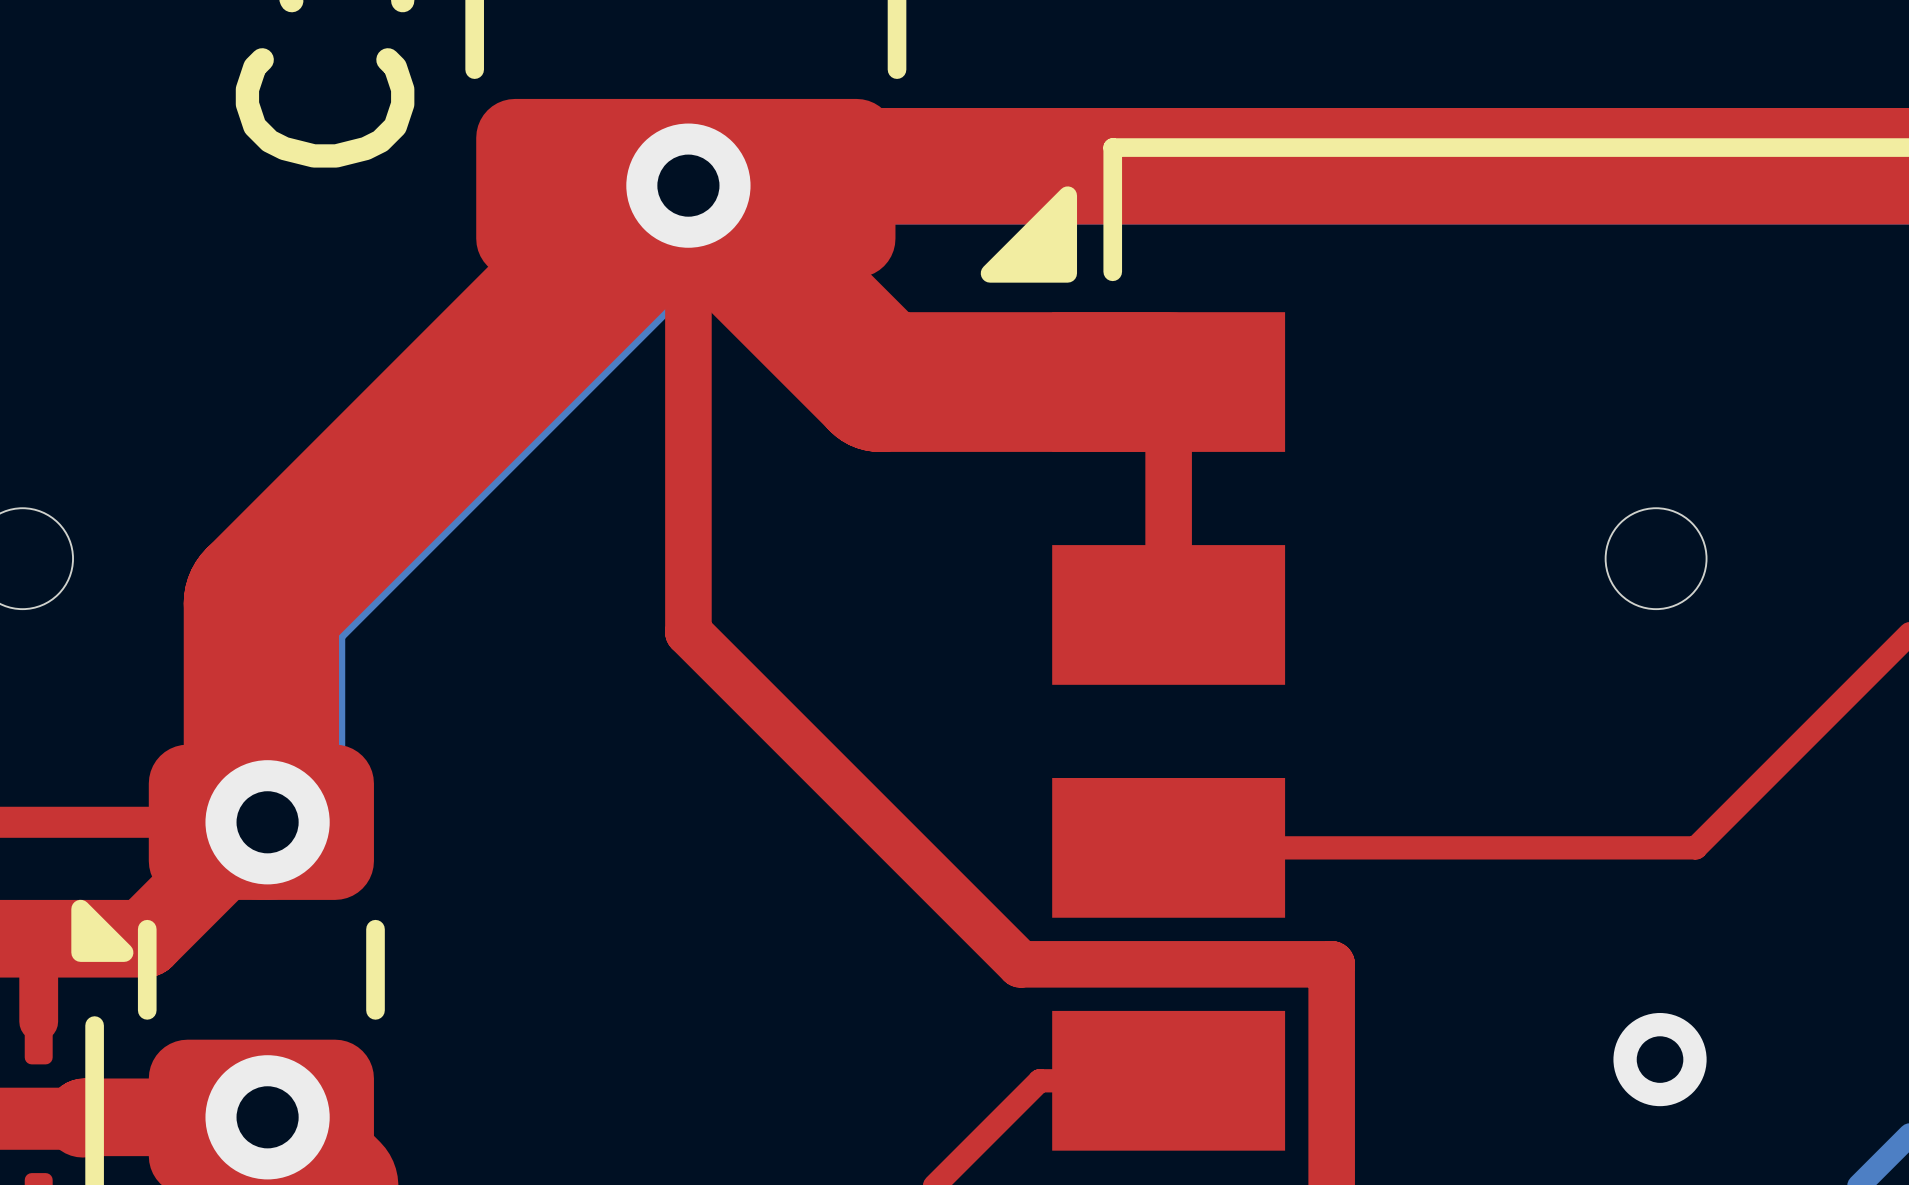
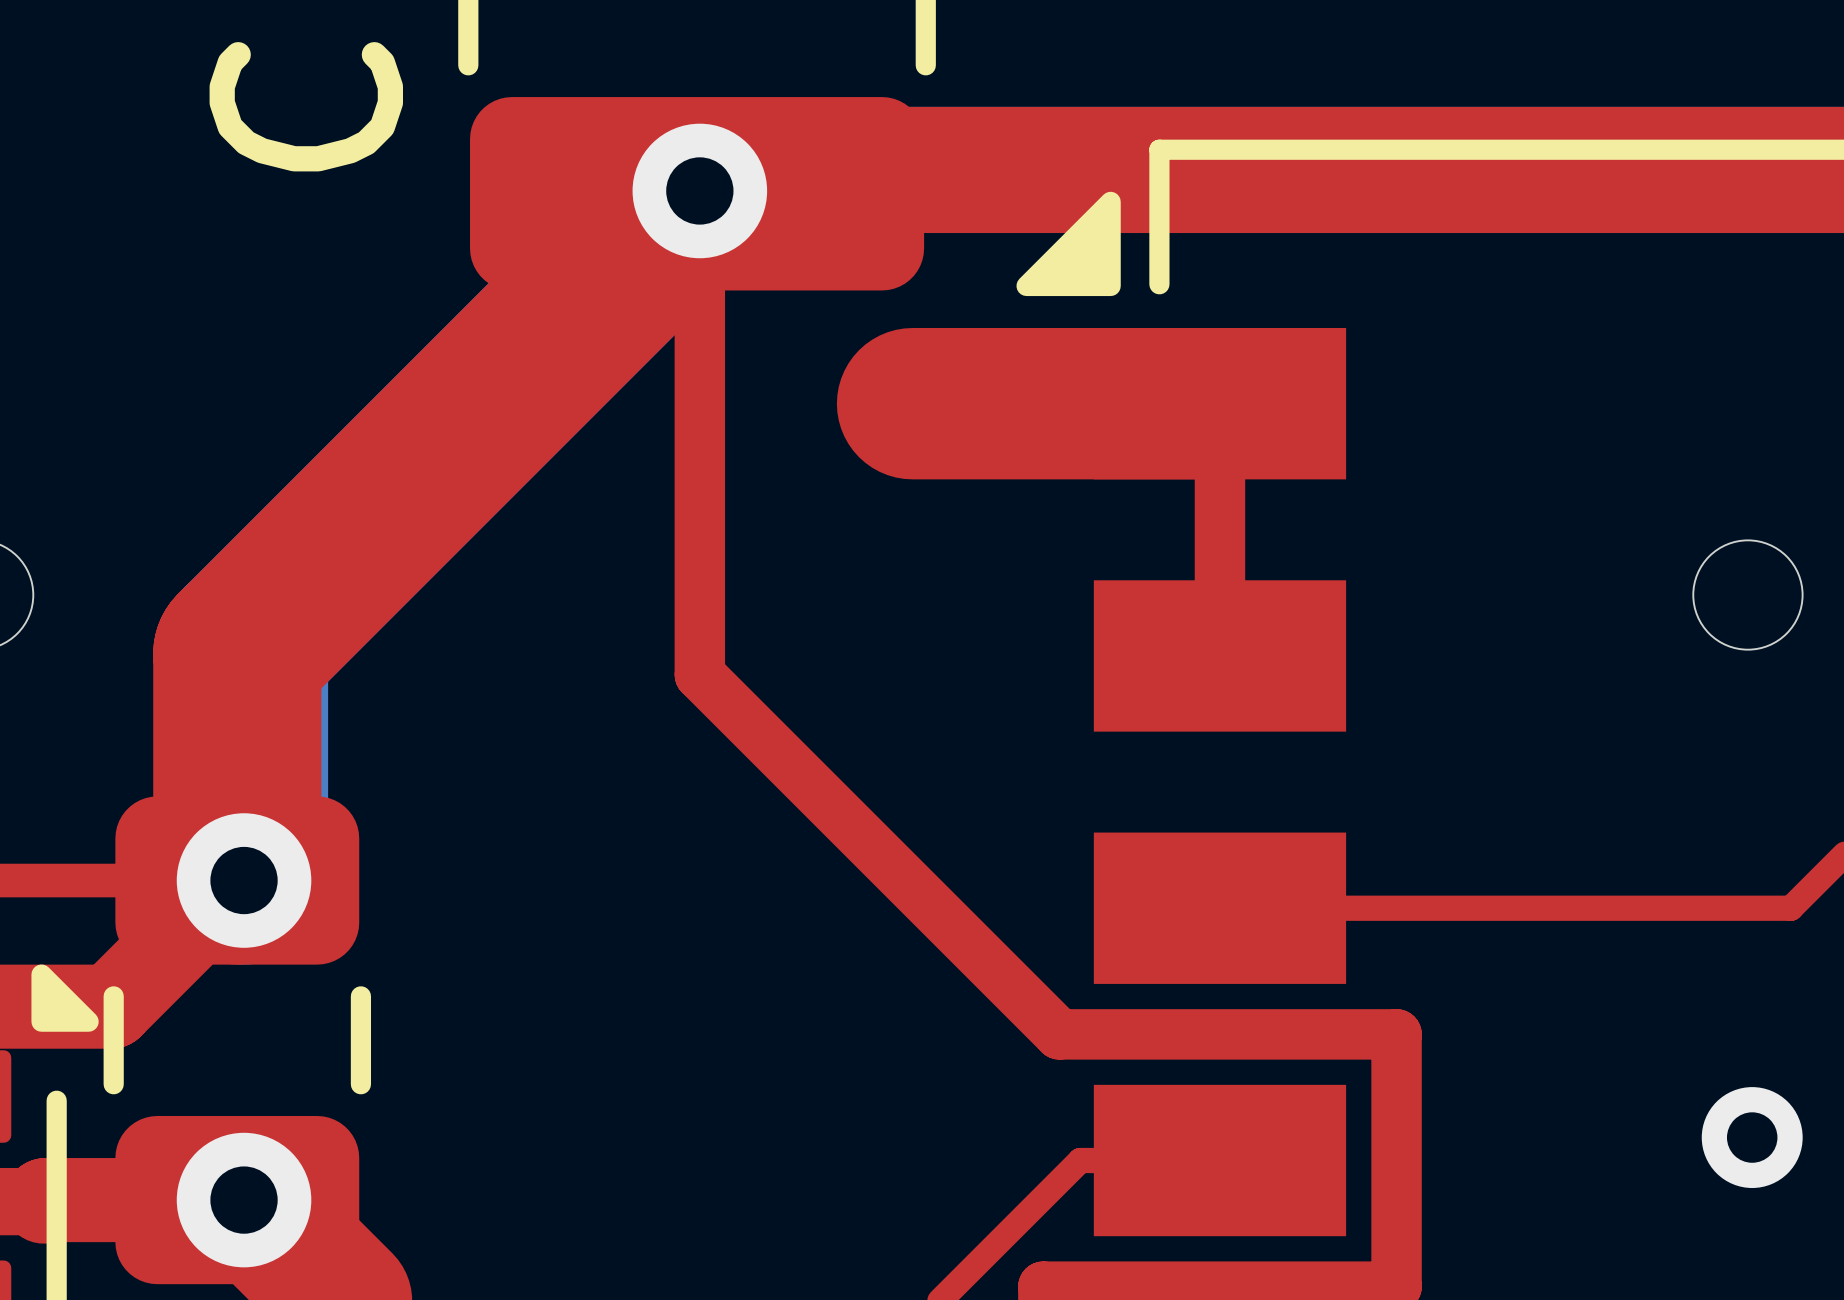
top track: (884, 382) (879, 382) (685, 188) (676, 188) (261, 603) (261, 612) -> (697, 193) (237, 653)

